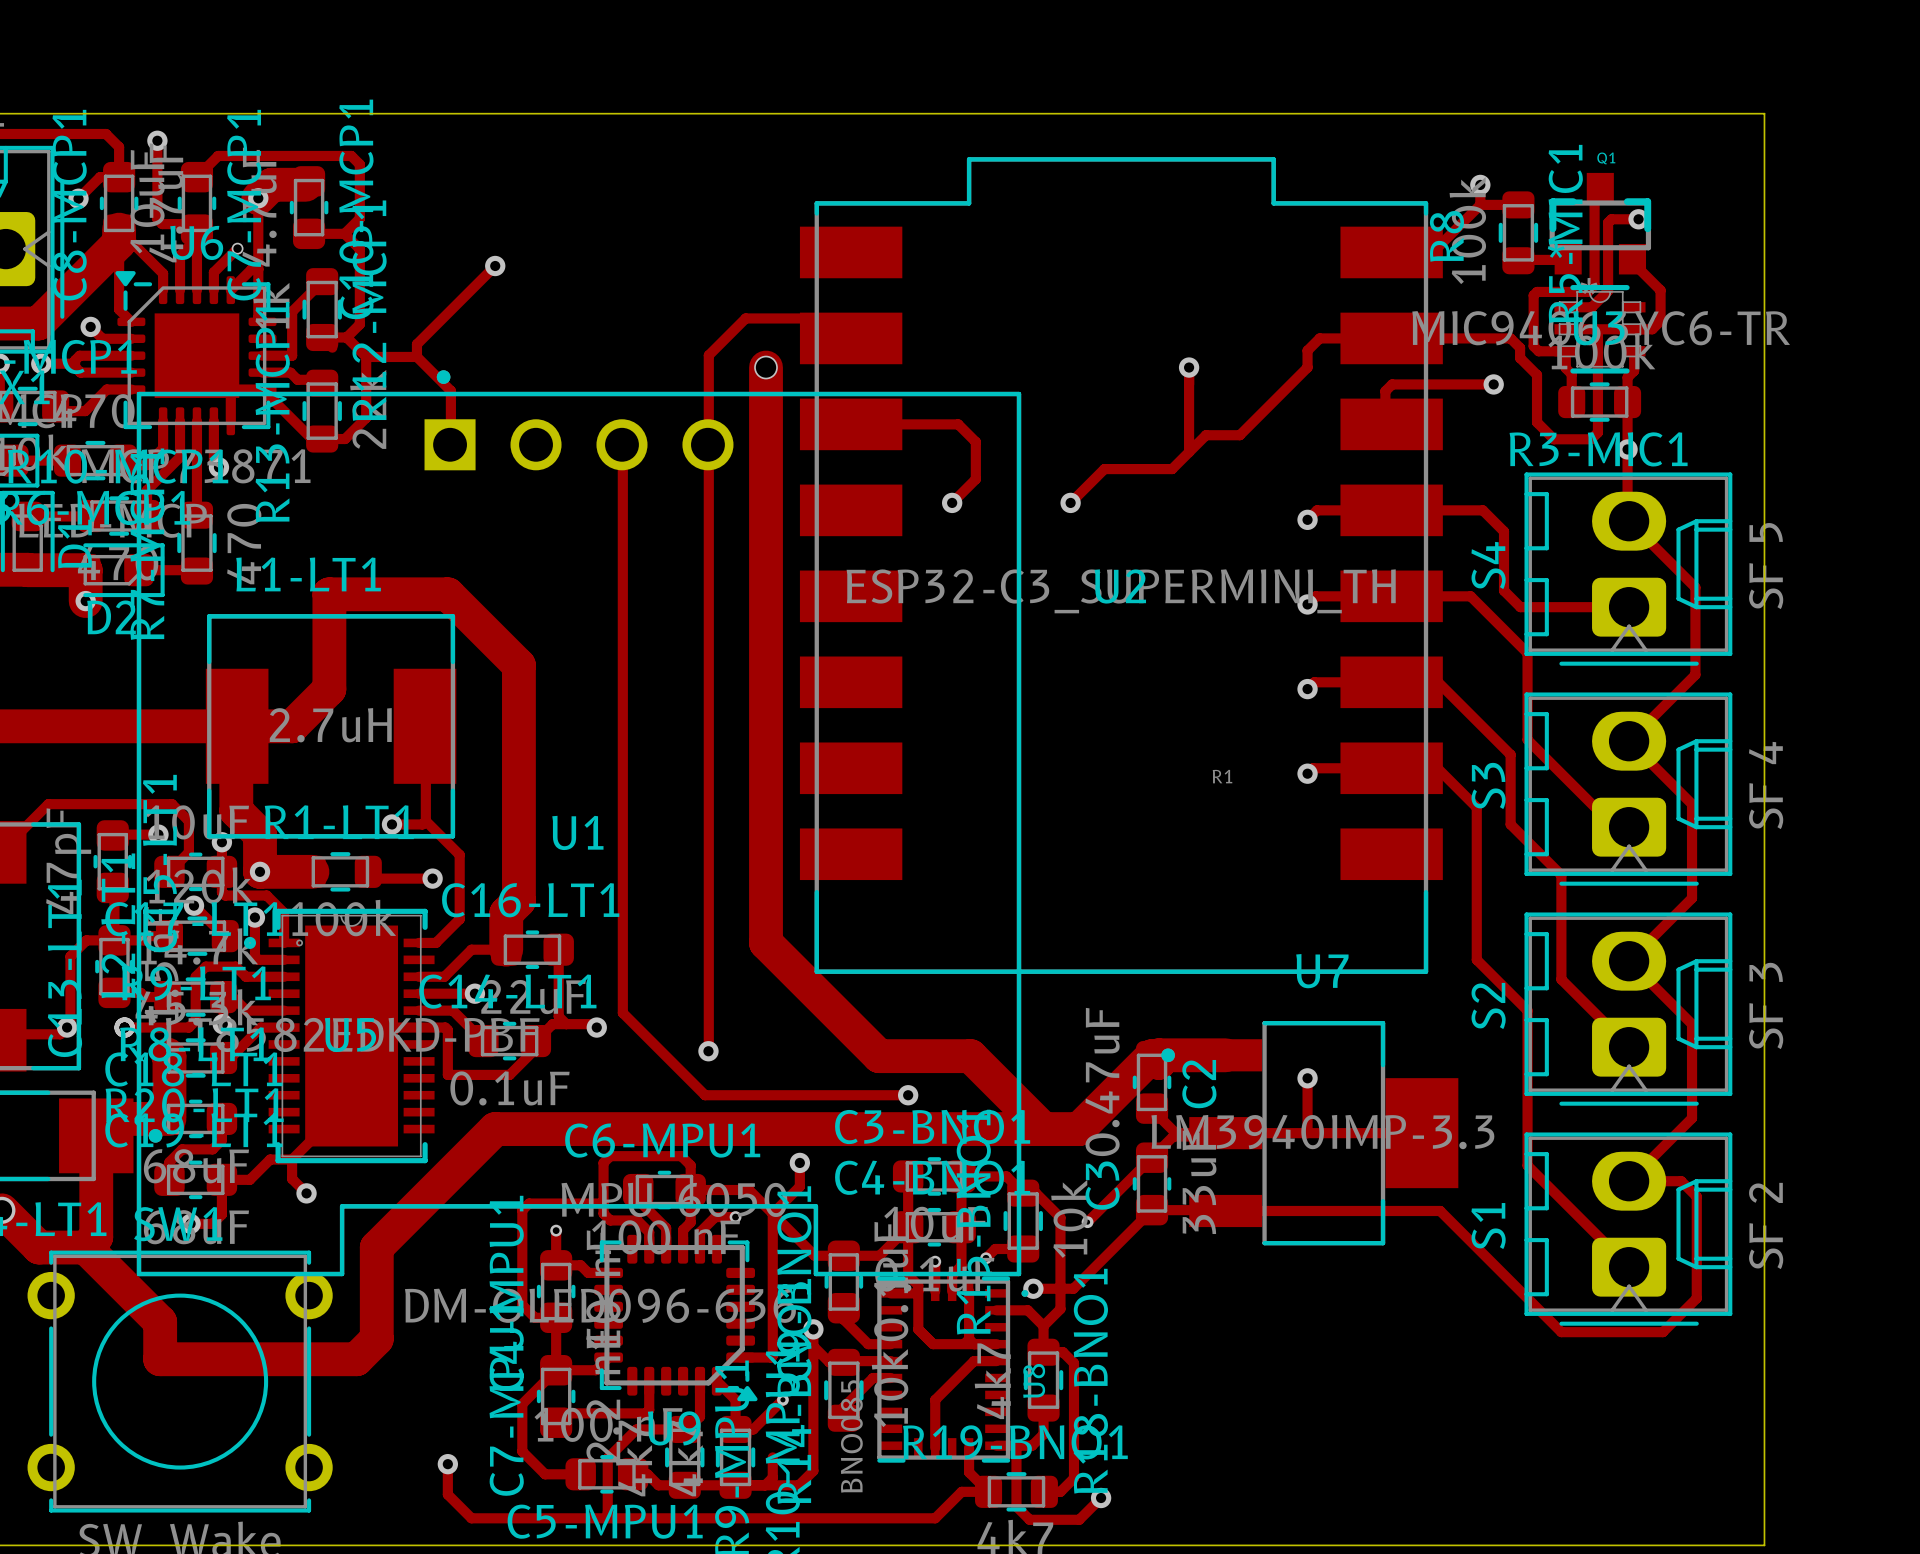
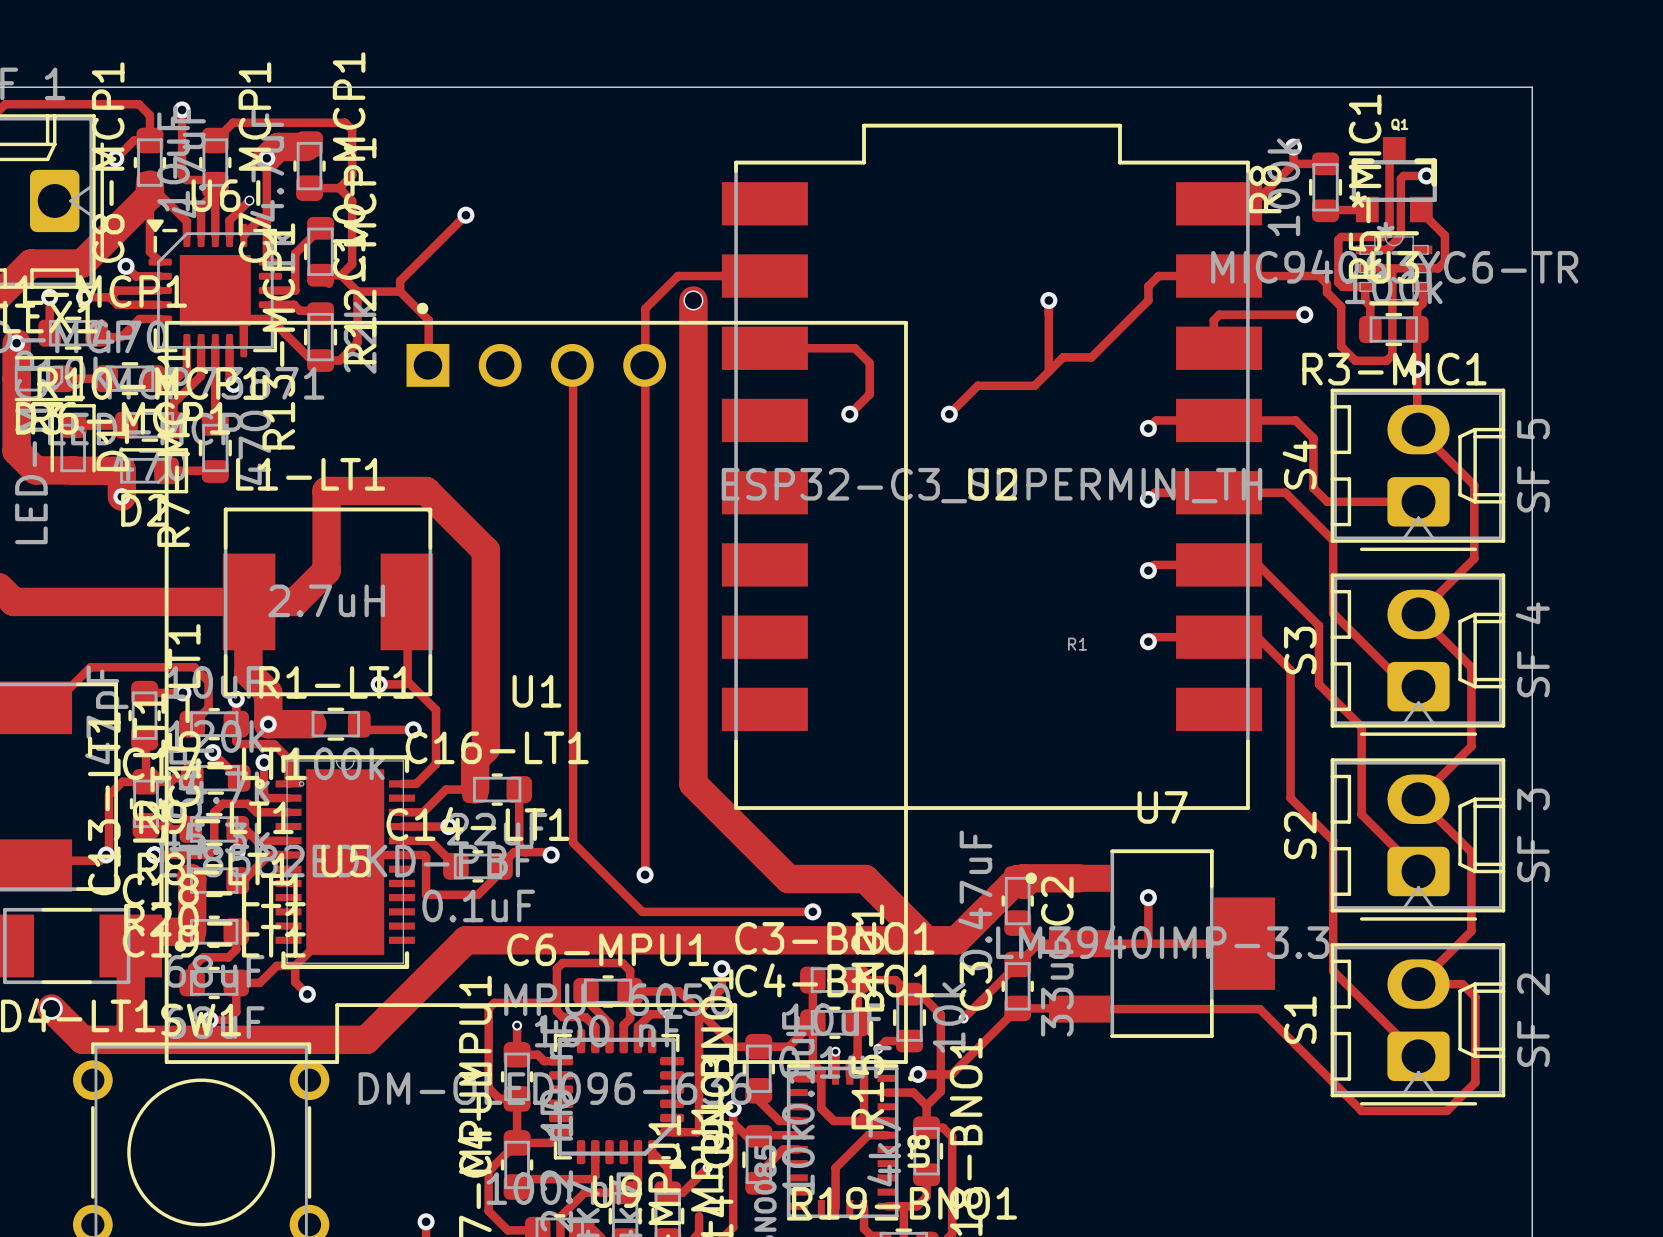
track: (851, 338) (831, 318) (745, 318) (708, 355) (708, 377) -> (764, 276) (678, 276) (645, 308)
track: (85, 1247) (160, 1322) (160, 1359) (356, 1359) (376, 1338) (376, 1247) -> (121, 1039) (366, 1039)

